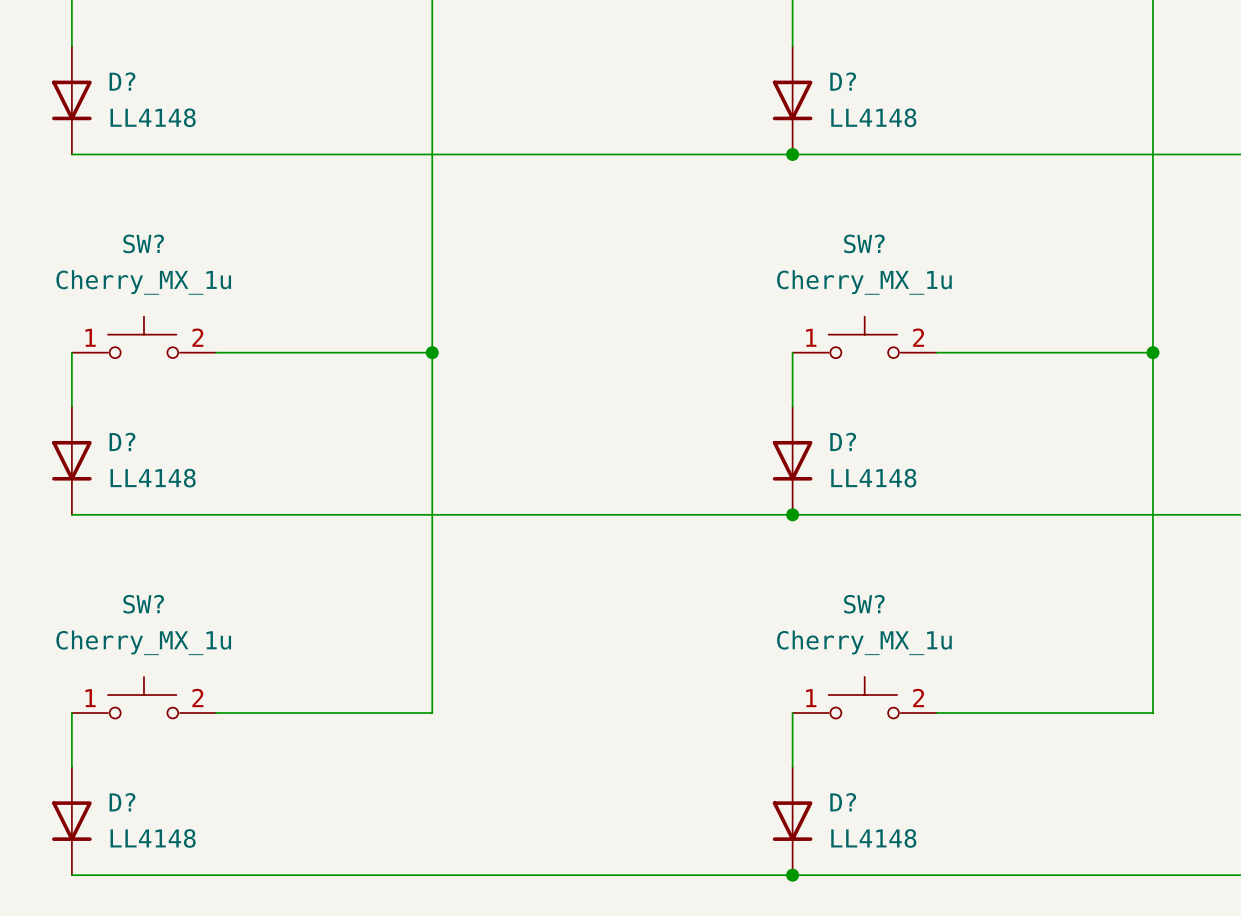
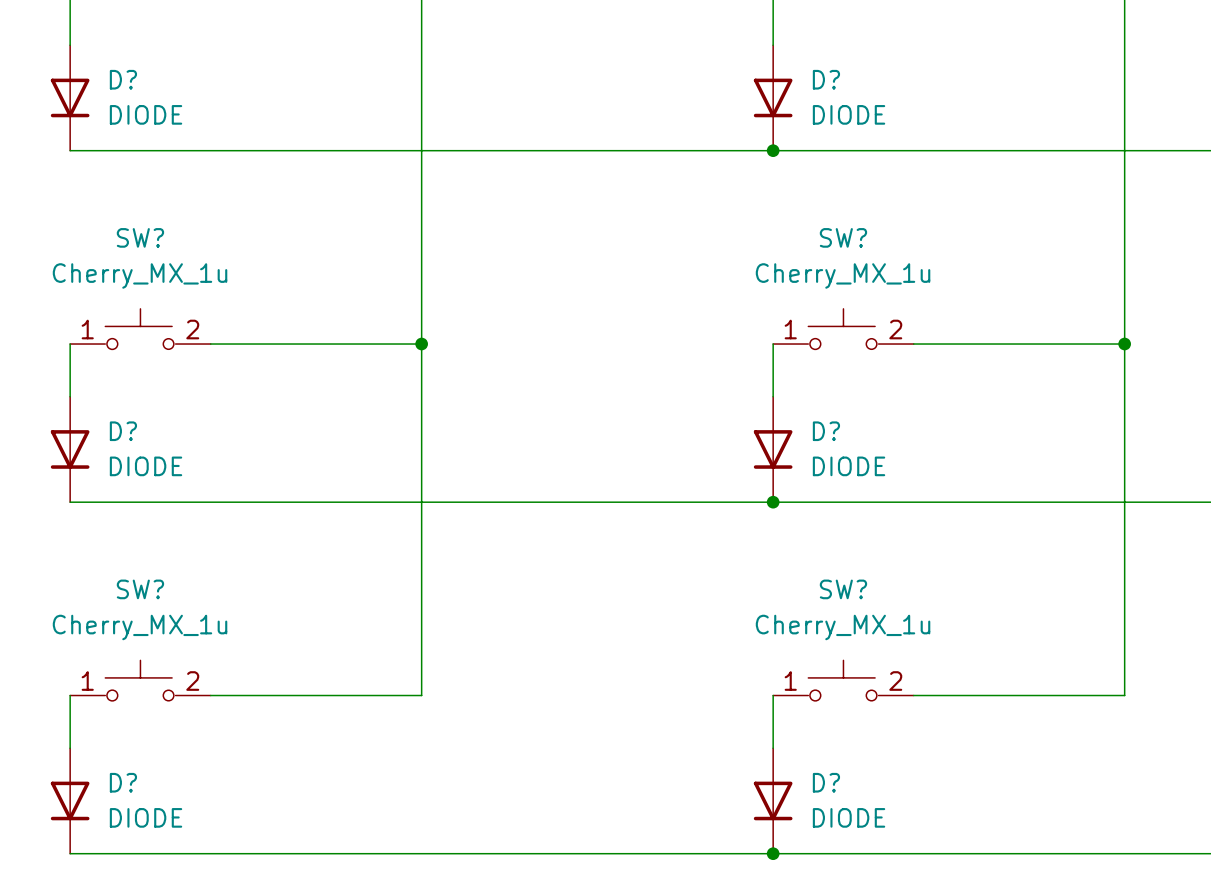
D? value: LL4148 (153, 117) -> DIODE (146, 114)
D? value: LL4148 (873, 117) -> DIODE (849, 114)
D? value: LL4148 (153, 478) -> DIODE (146, 466)
D? value: LL4148 (873, 478) -> DIODE (849, 466)
D? value: LL4148 (153, 838) -> DIODE (146, 817)
D? value: LL4148 (873, 838) -> DIODE (849, 817)

